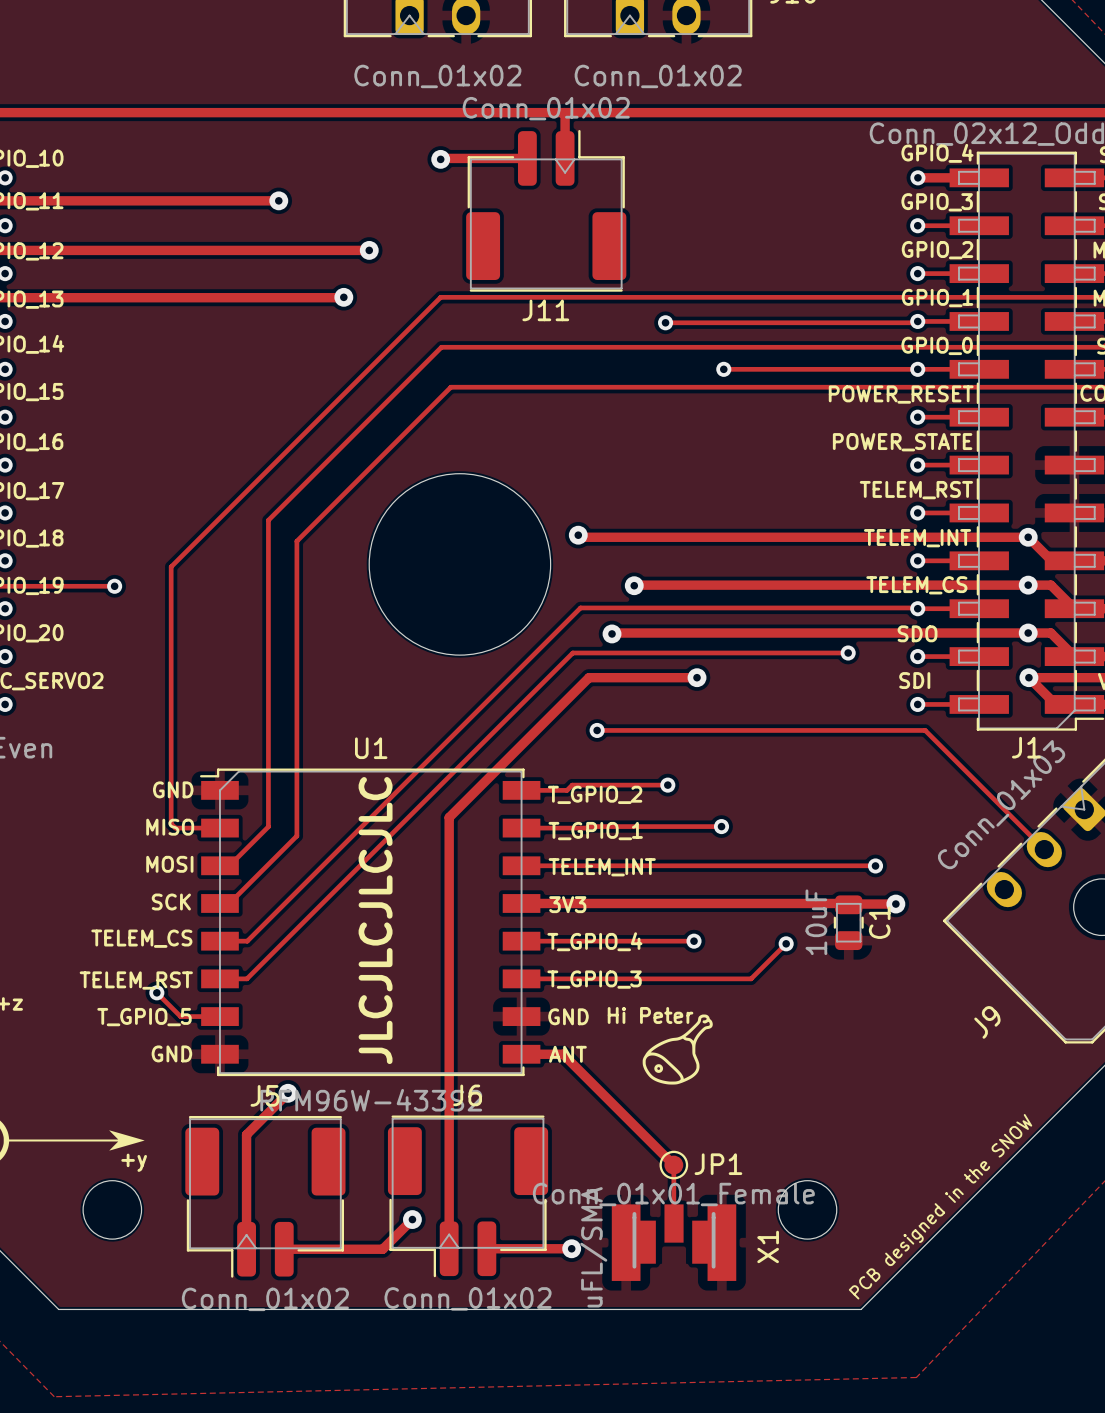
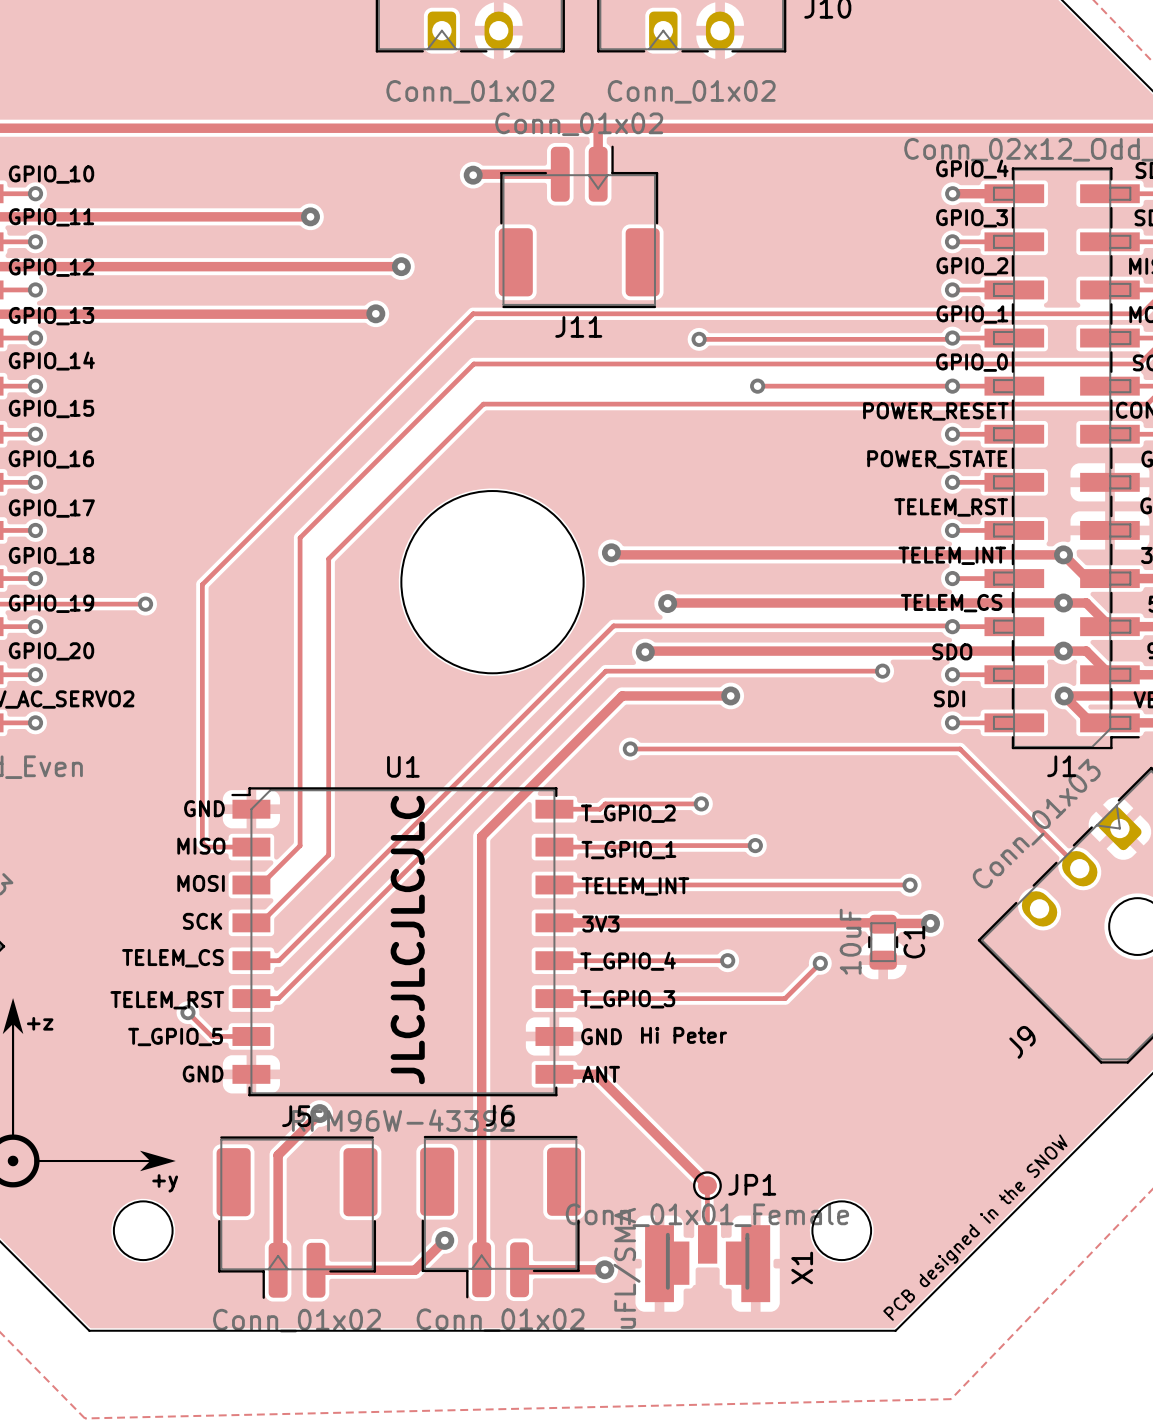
drawing: [642, 1014, 713, 1085] -> none

